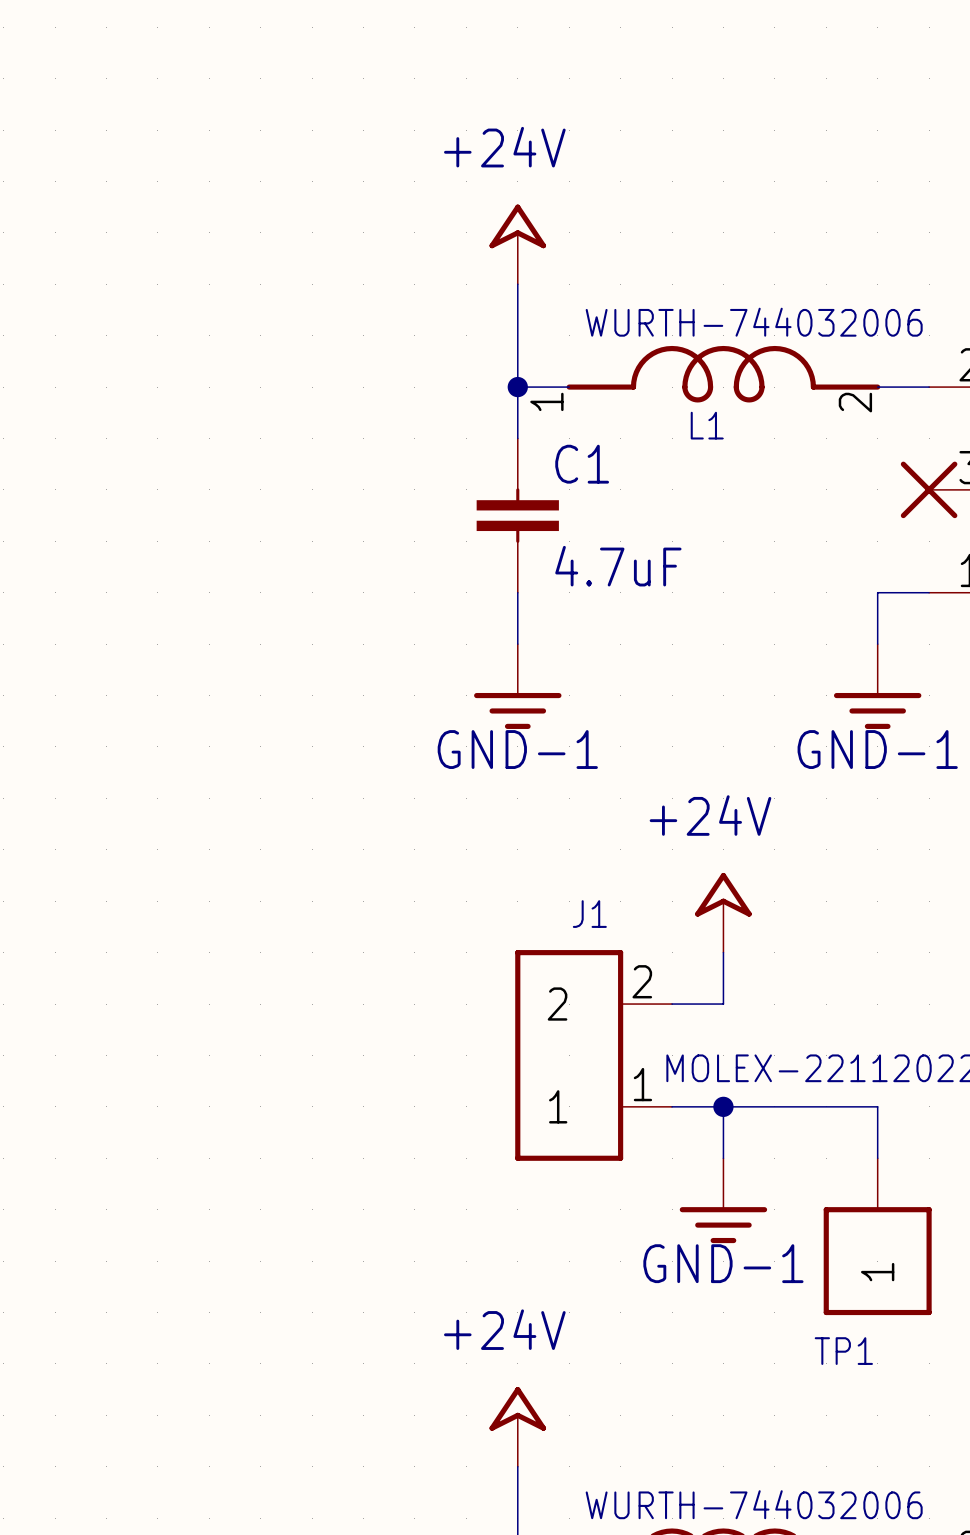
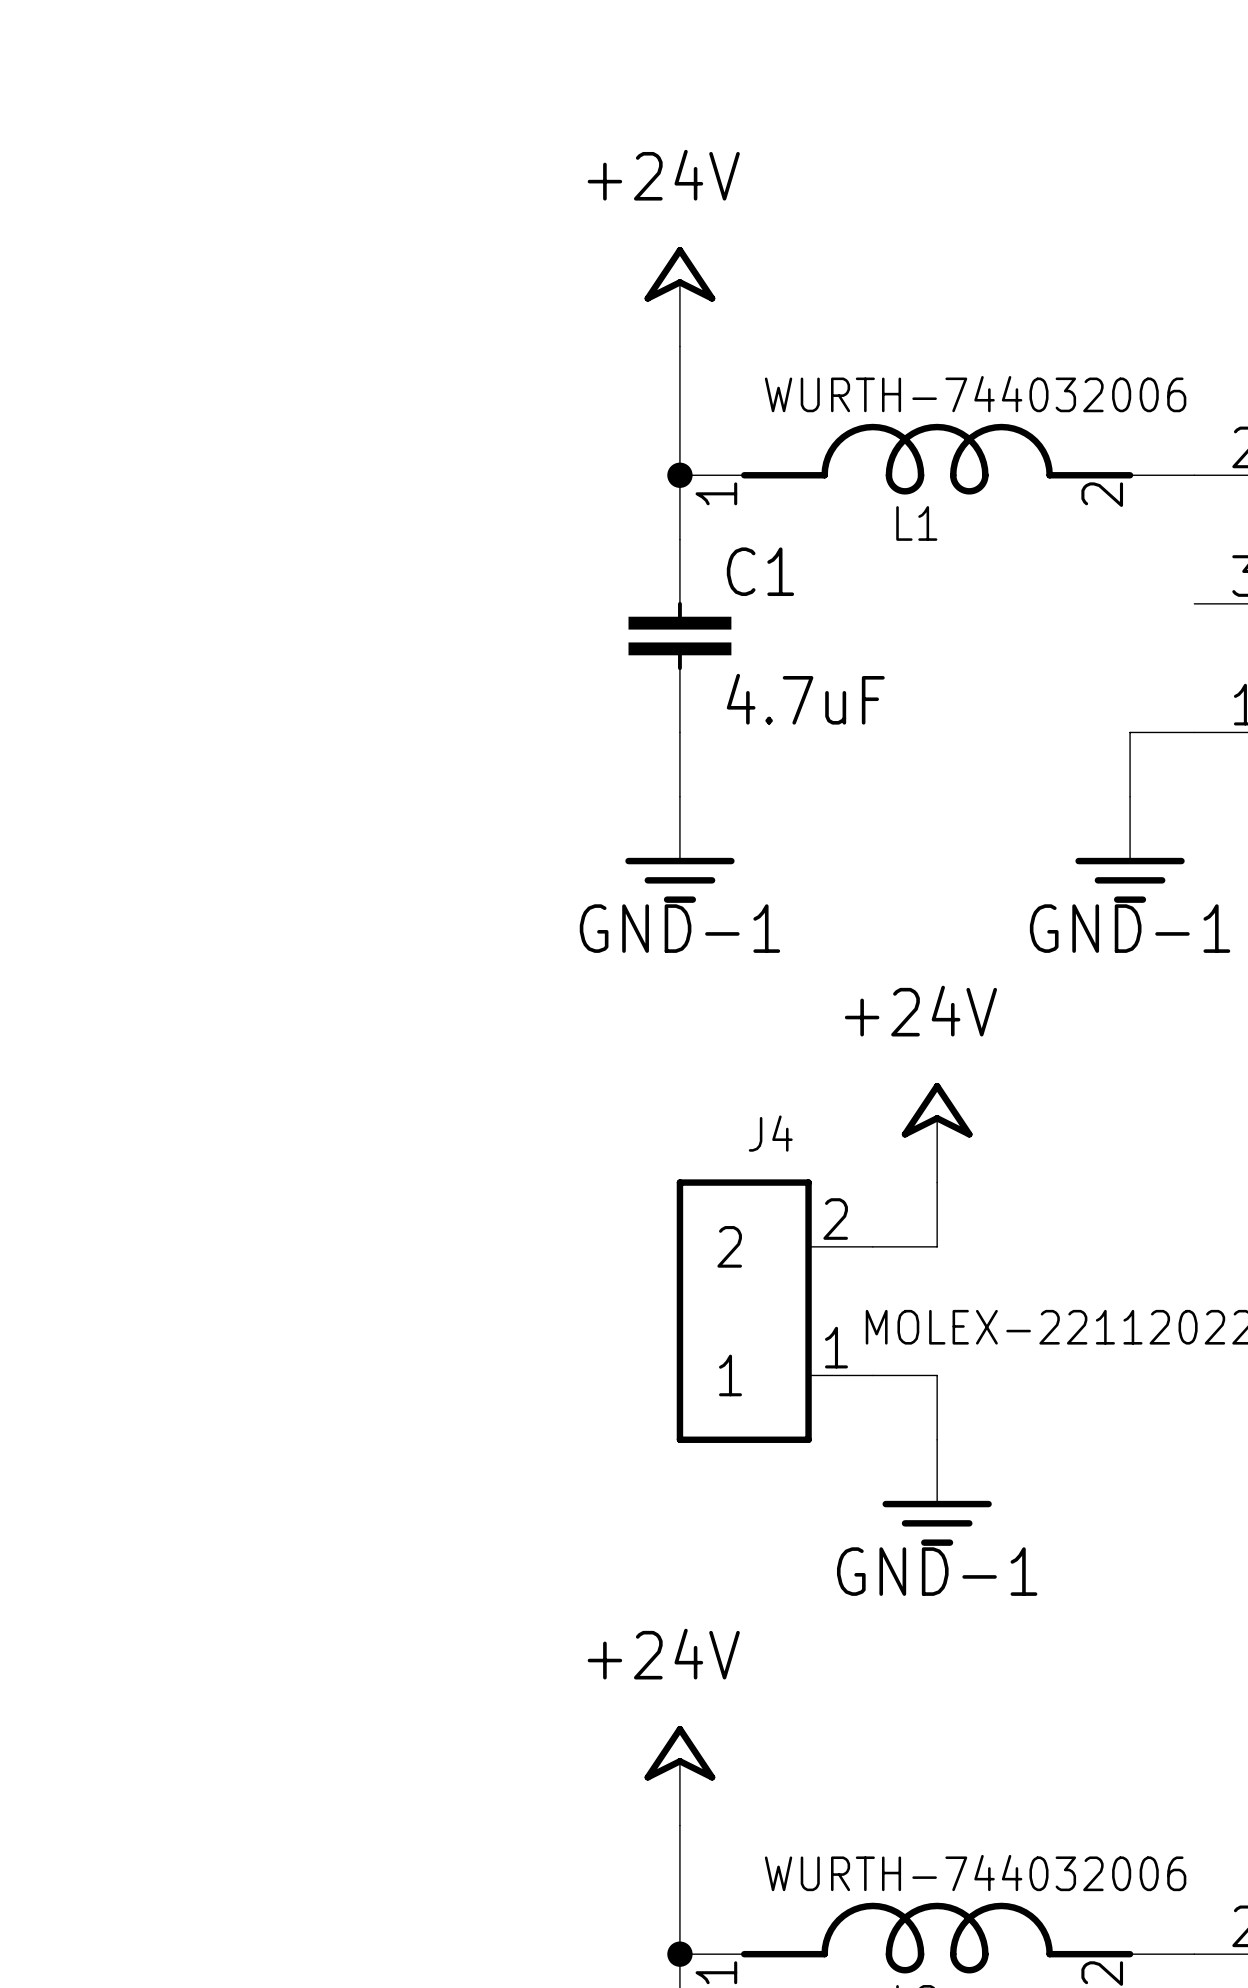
part: (929, 489) -> none
J1 name: J1 (589, 914) -> J4 (770, 1133)
wire: (723, 1106) (877, 1106) (877, 1158) -> none
junction: (723, 1106) -> none
TP1: (877, 1236) -> none

